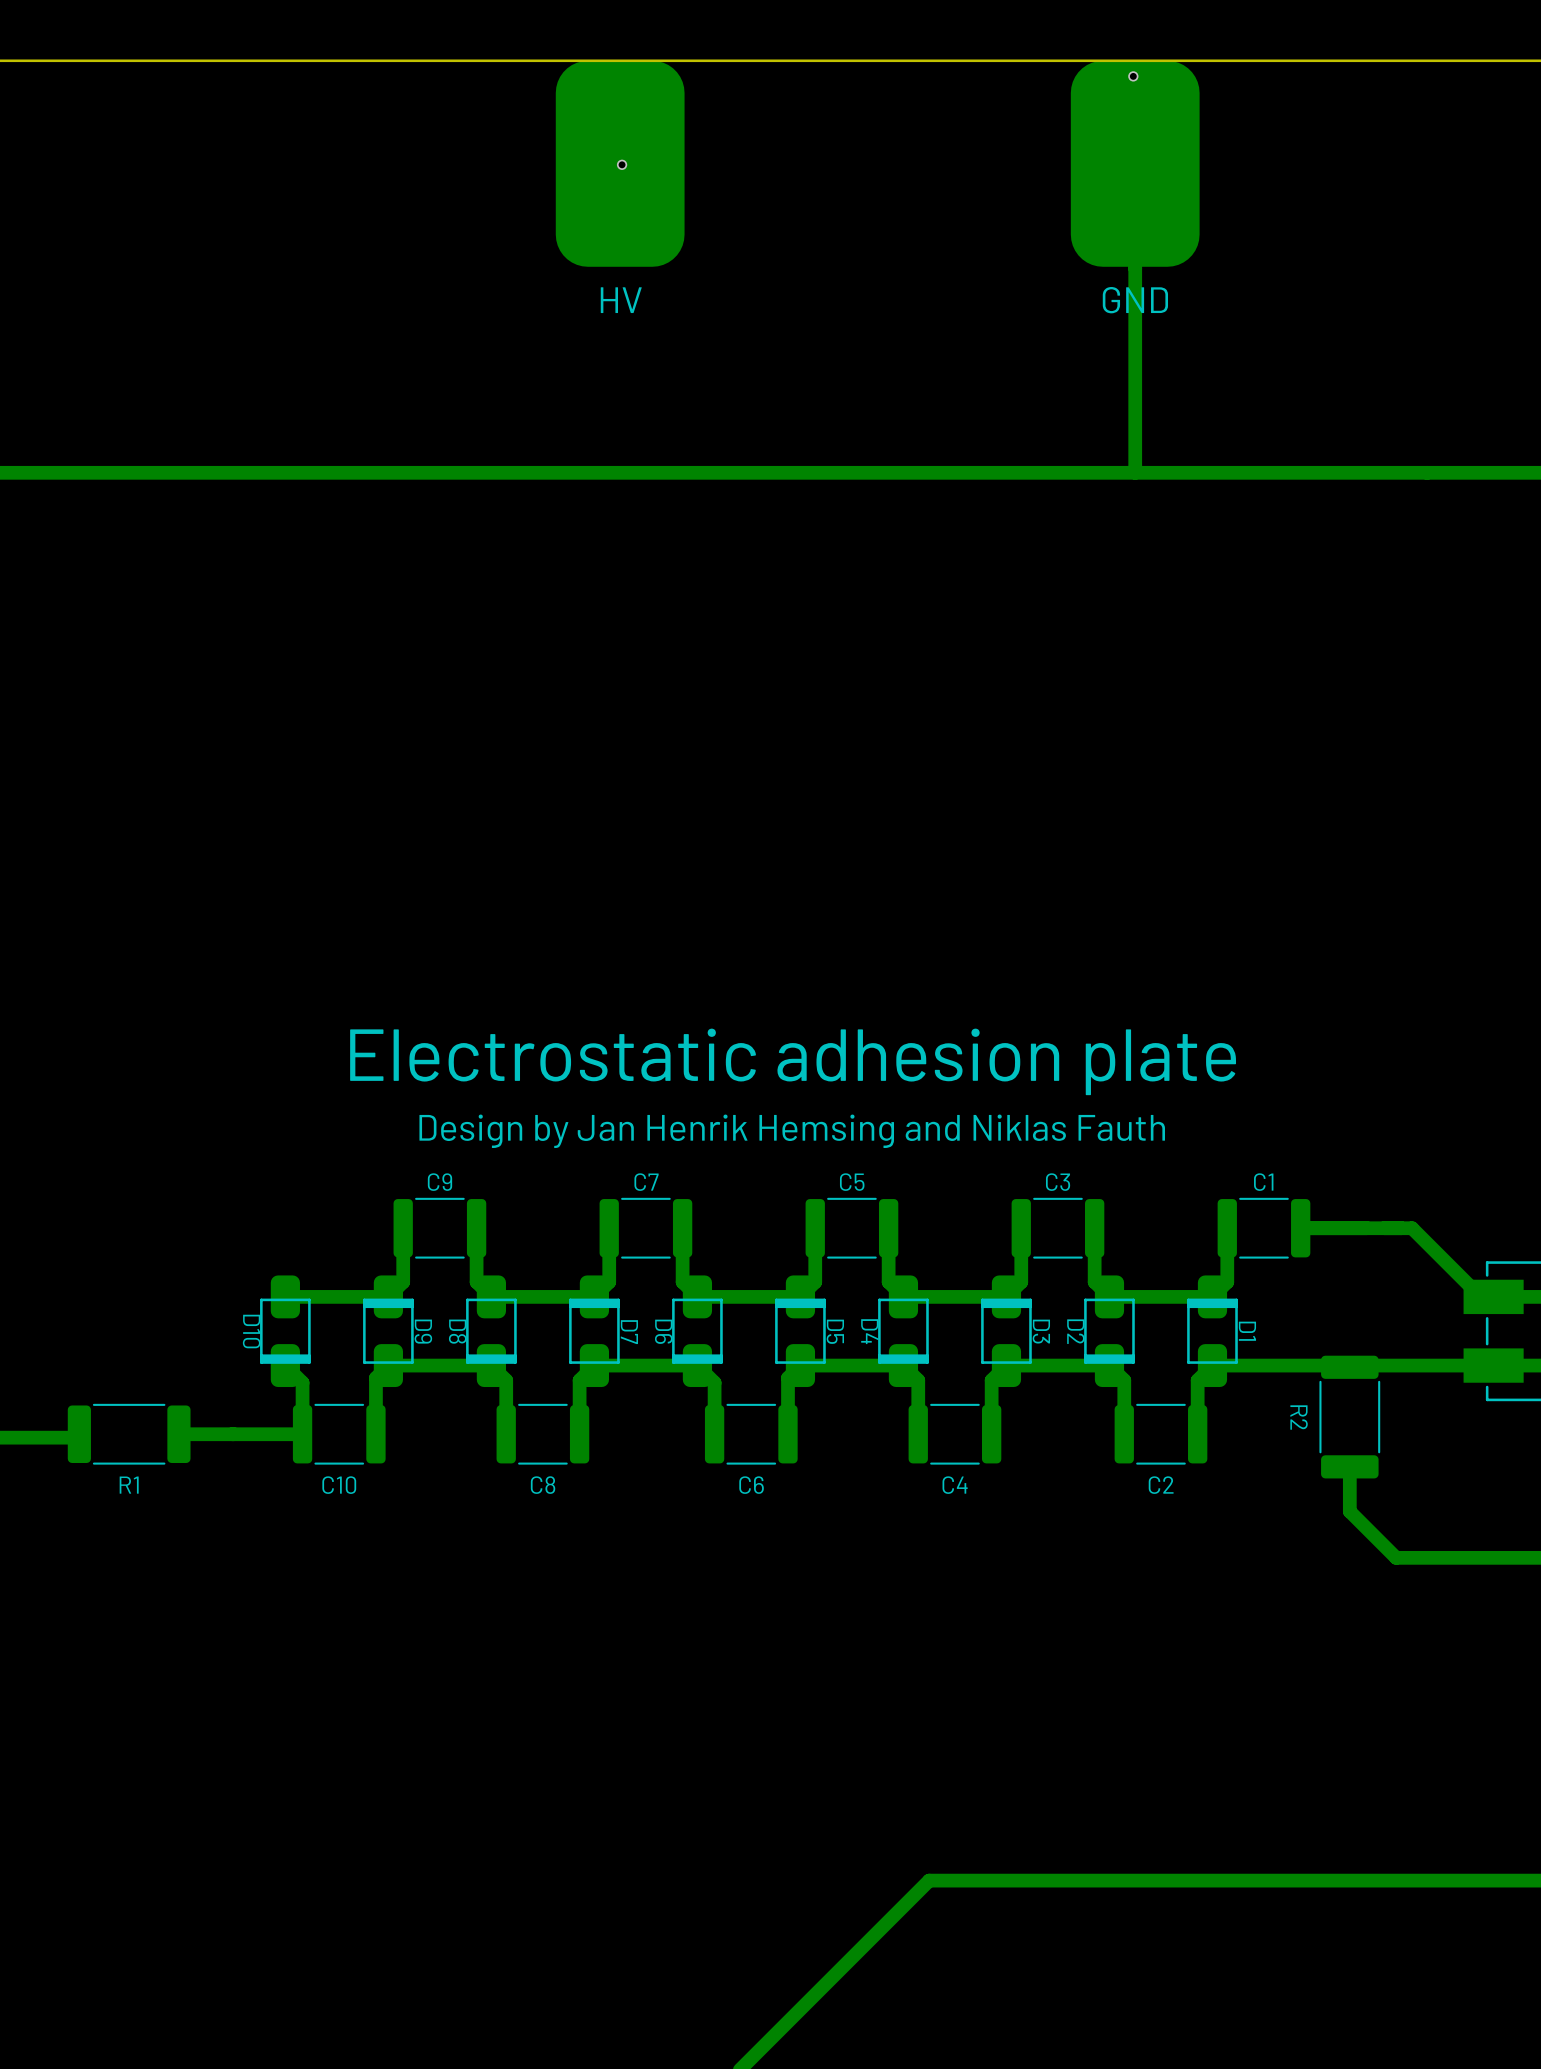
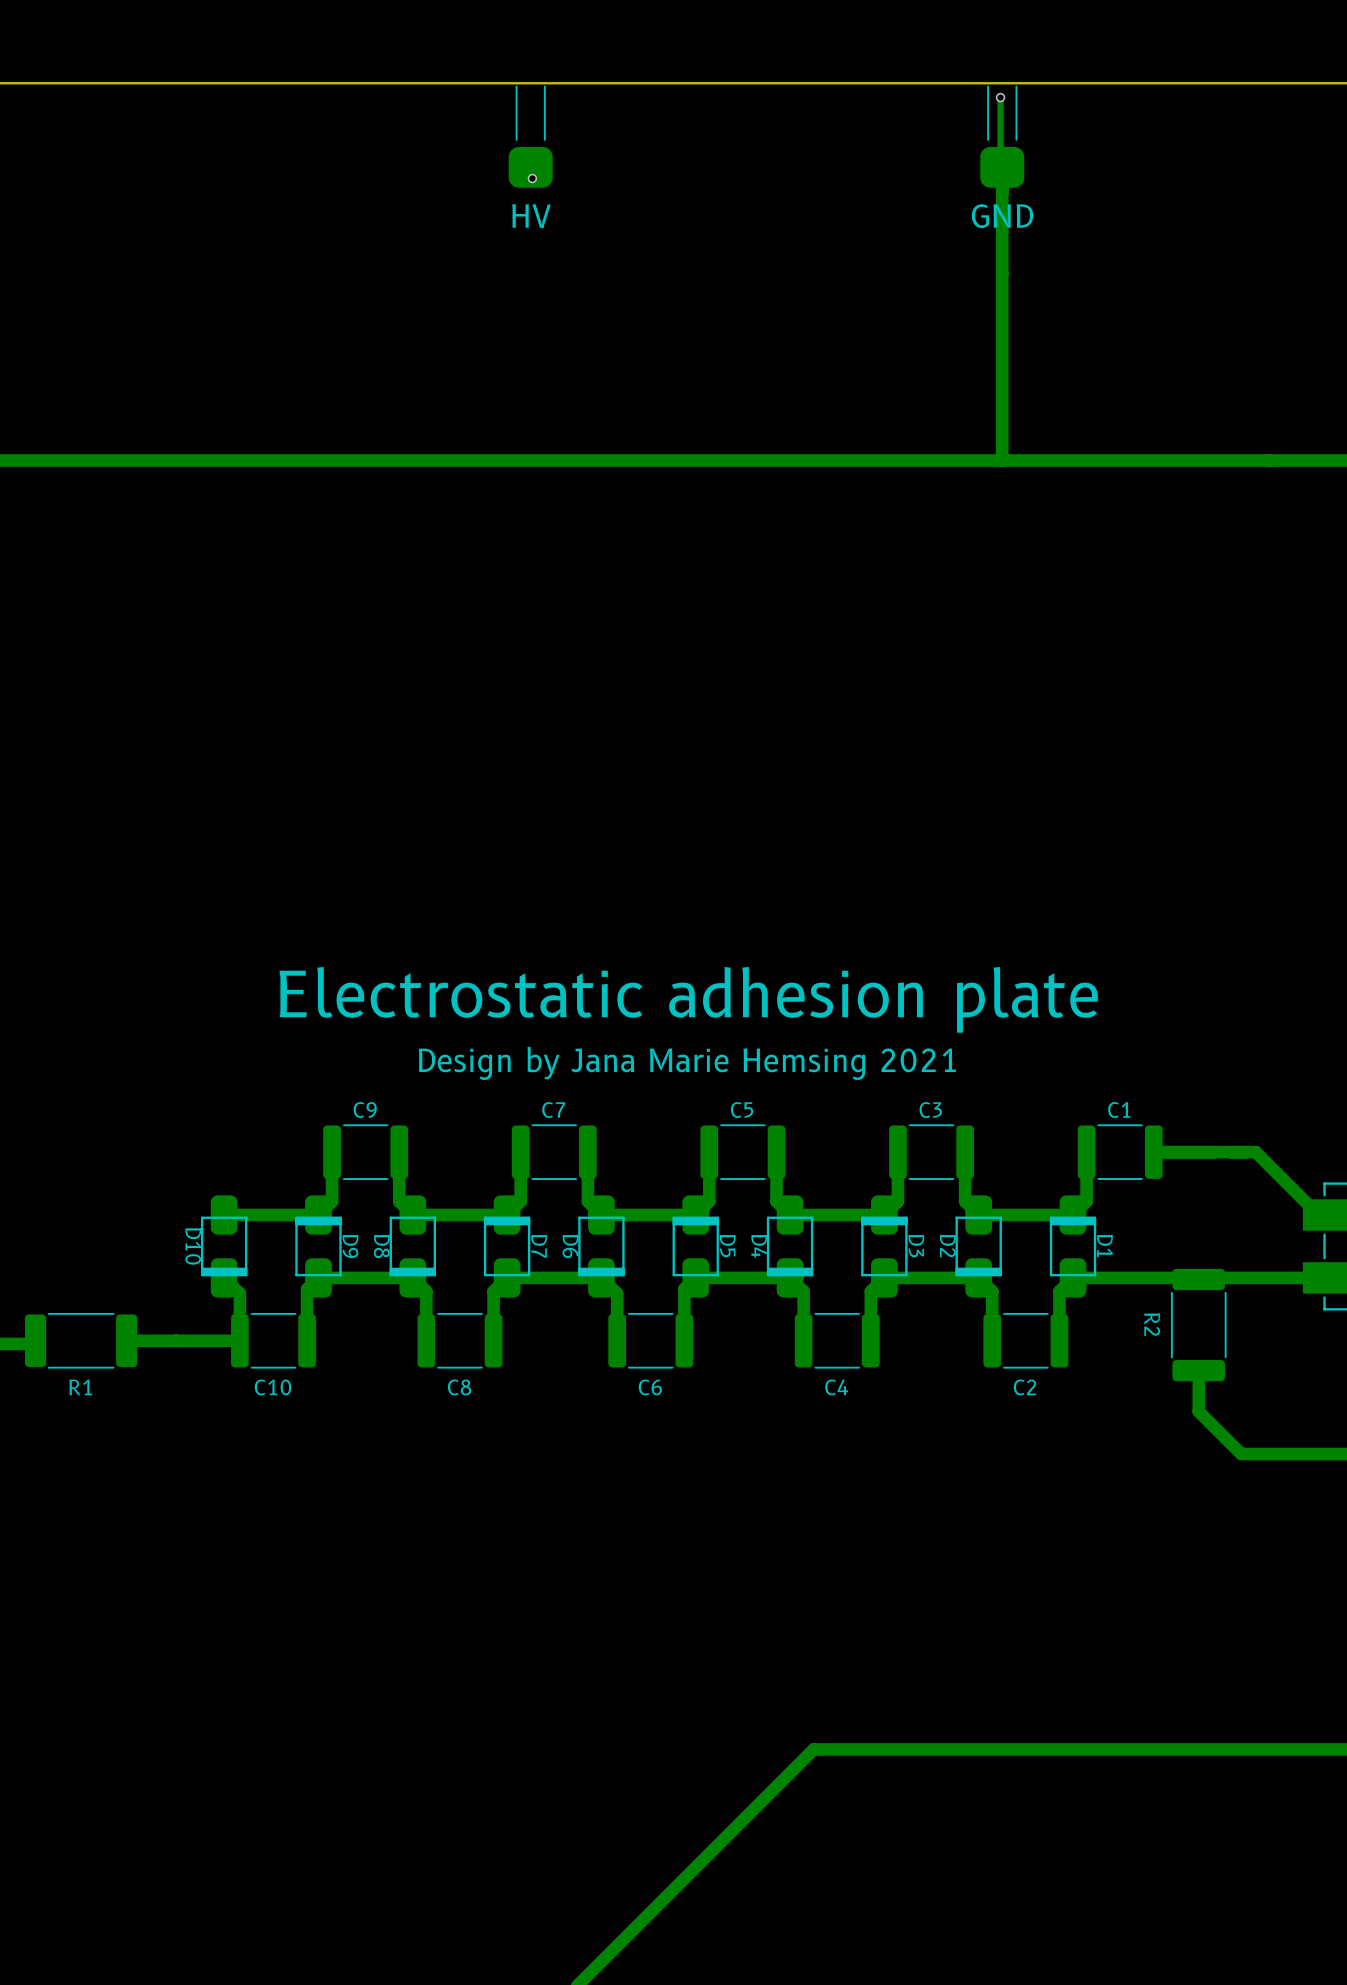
track: none -> (1000, 97) (1000, 165) (1002, 167)
part: none -> (530, 136)
part: none -> (1002, 136)
part: (620, 163) -> none
part: (1135, 163) -> none
text position: HV (621, 300) -> HV (531, 216)
text position: GND (1135, 300) -> GND (1002, 216)
text: Design by Jan Henrik Hemsing and Niklas Fauth (792, 1131) -> Design by Jana Marie Hemsing 2021 (687, 1063)

